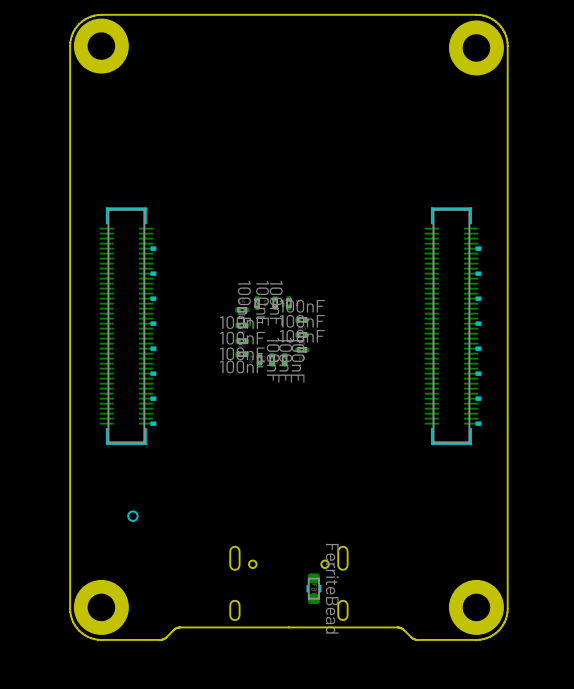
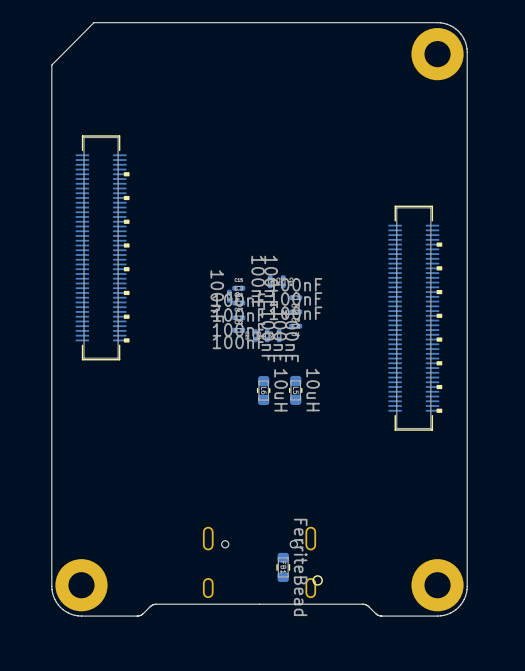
board edge: (114, 14) (94, 15) (79, 23) (70, 39) (70, 59) -> (93, 22) (51, 65)
part: (101, 46) -> none
part position: (275, 303) -> (270, 281)
part position: (288, 303) -> (283, 281)
part position: (242, 309) -> (238, 288)
part position: (302, 319) -> (295, 297)
part position: (242, 325) -> (238, 303)
part position: (128, 326) -> (102, 247)
part position: (302, 334) -> (295, 311)
part position: (242, 341) -> (238, 317)
part position: (302, 349) -> (295, 326)
part position: (242, 354) -> (238, 330)
part position: (259, 359) -> (255, 335)
part position: (272, 359) -> (267, 335)
part position: (284, 359) -> (279, 335)
part: none -> 10uH (263, 390)
part: none -> 10uH (295, 390)
part position: (132, 516) -> (317, 580)

